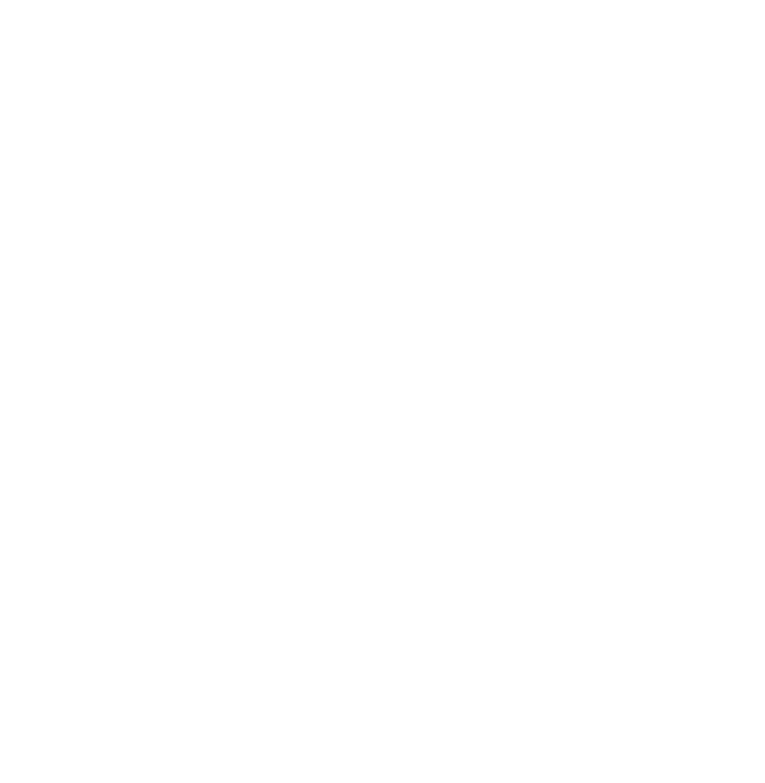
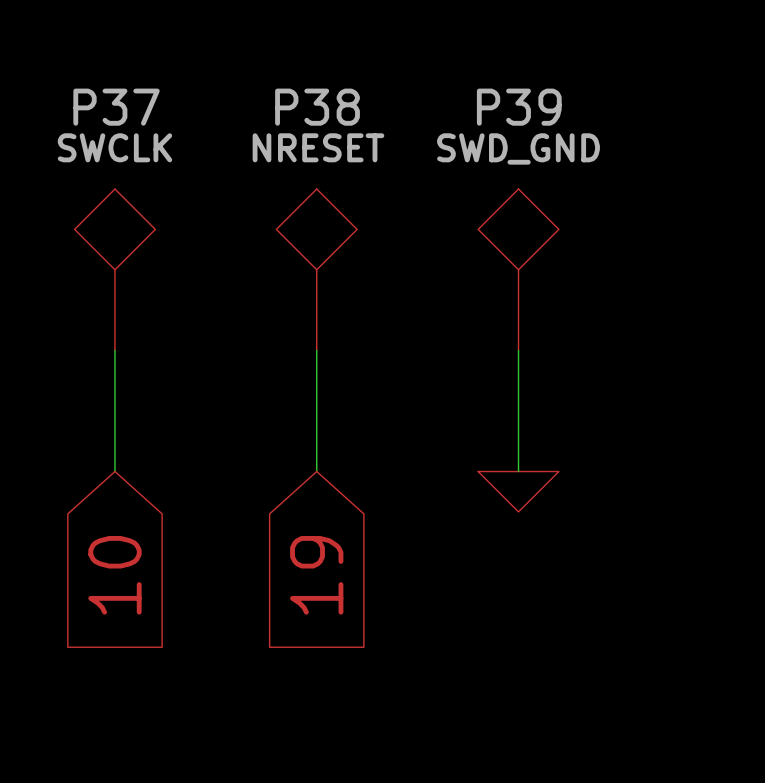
P37: none -> SWCLK (114, 269)
P38: none -> NRESET (316, 269)
P39: none -> SWD_GND (518, 269)
wire: none -> (114, 350) (114, 471)
wire: none -> (316, 350) (316, 471)
wire: none -> (518, 350) (518, 471)
power symbol: none -> (518, 491)
global label: none -> 10 (114, 575)
global label: none -> 19 (316, 575)

